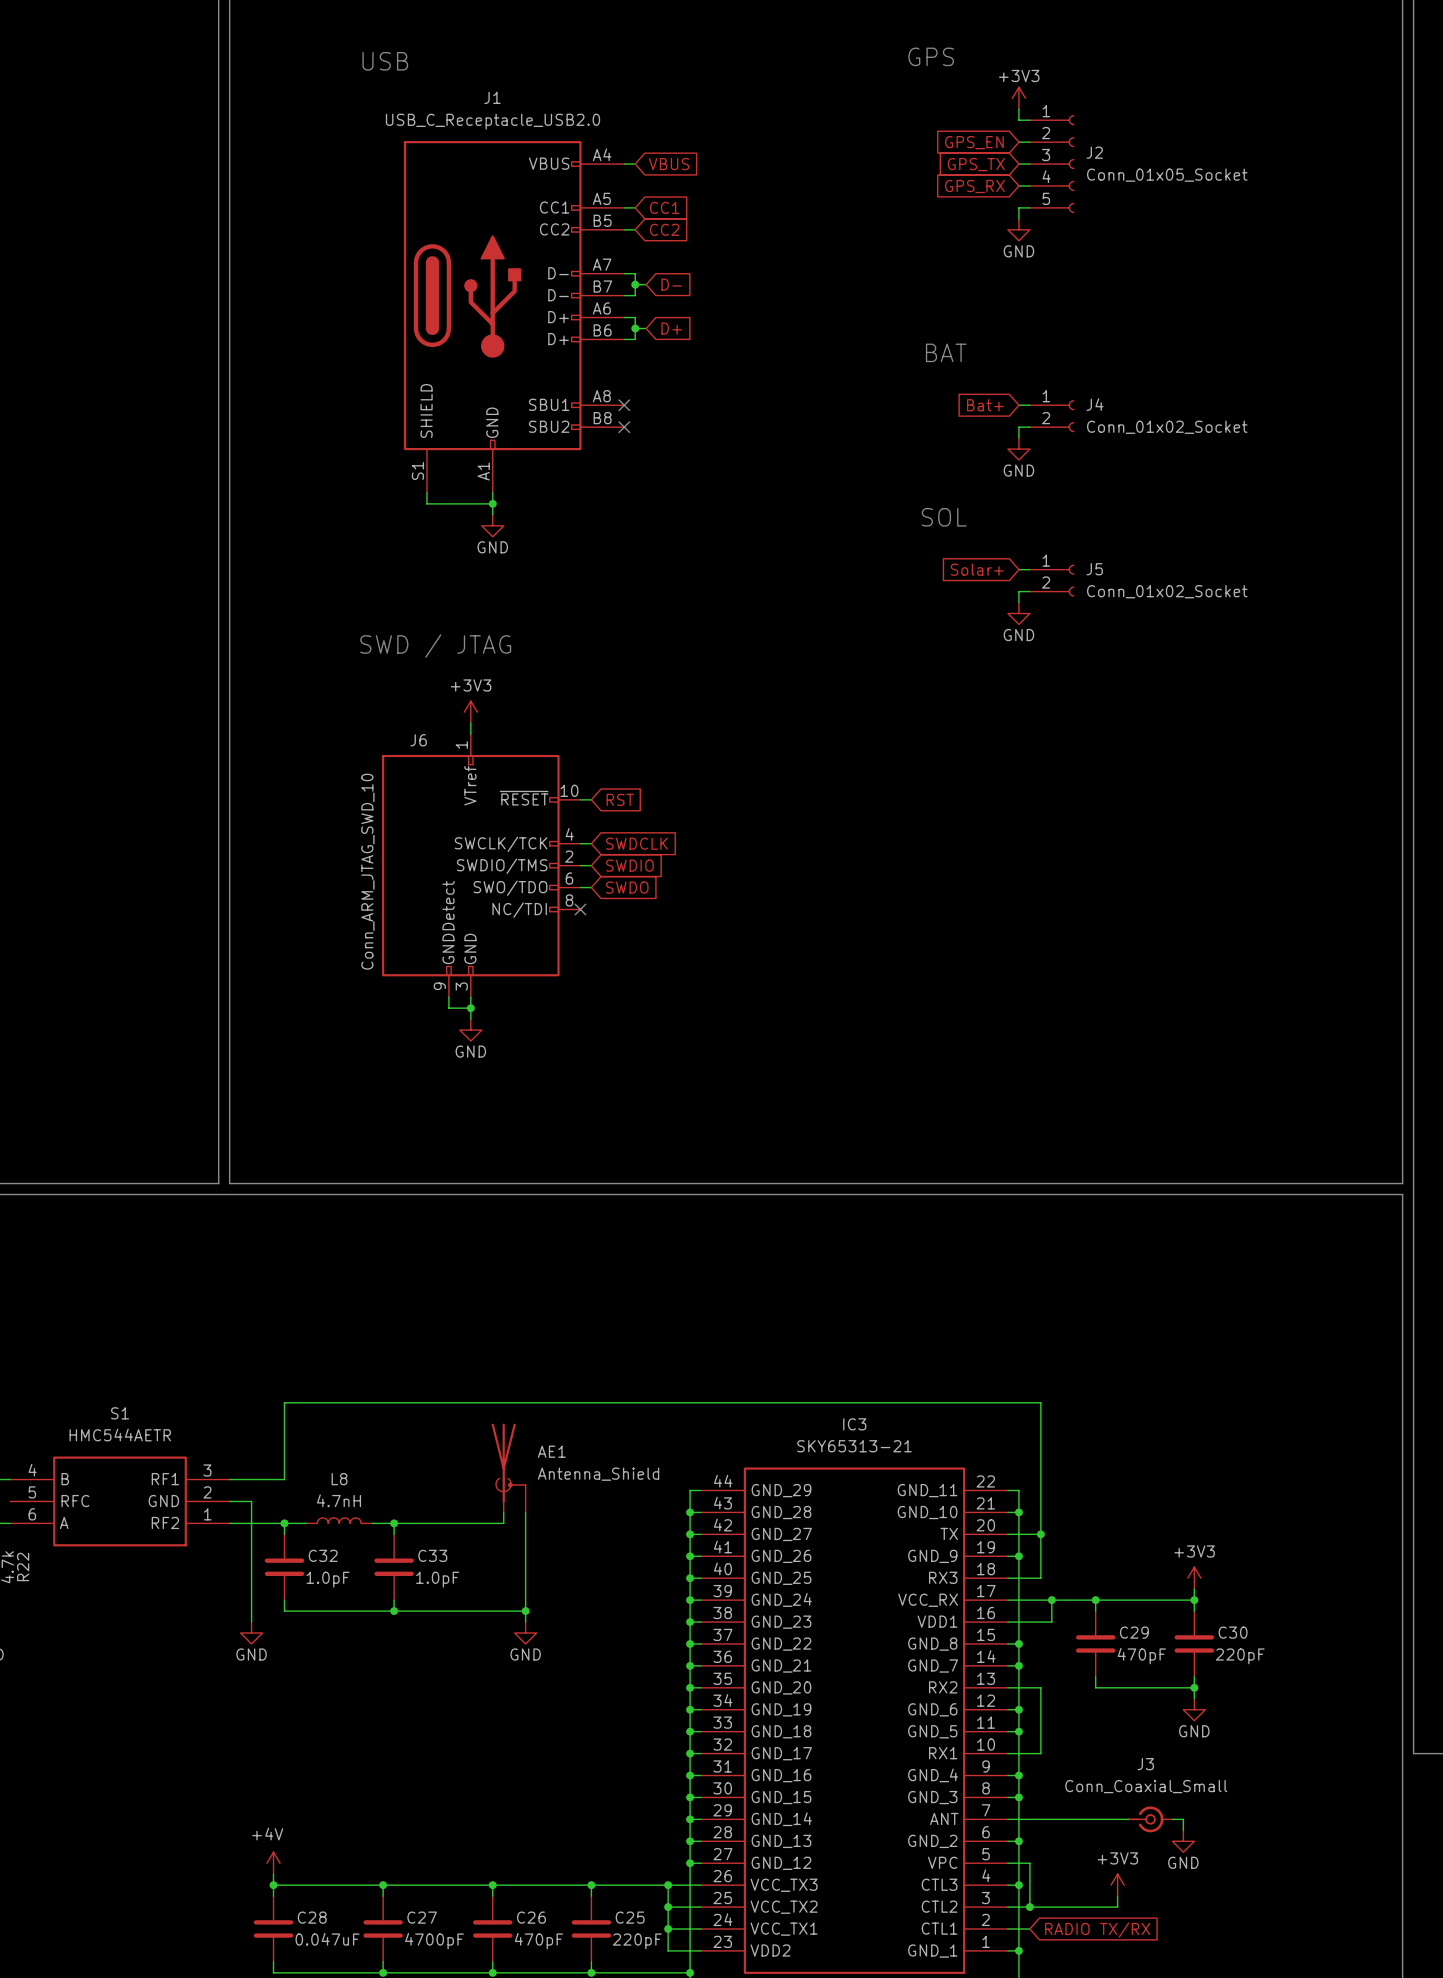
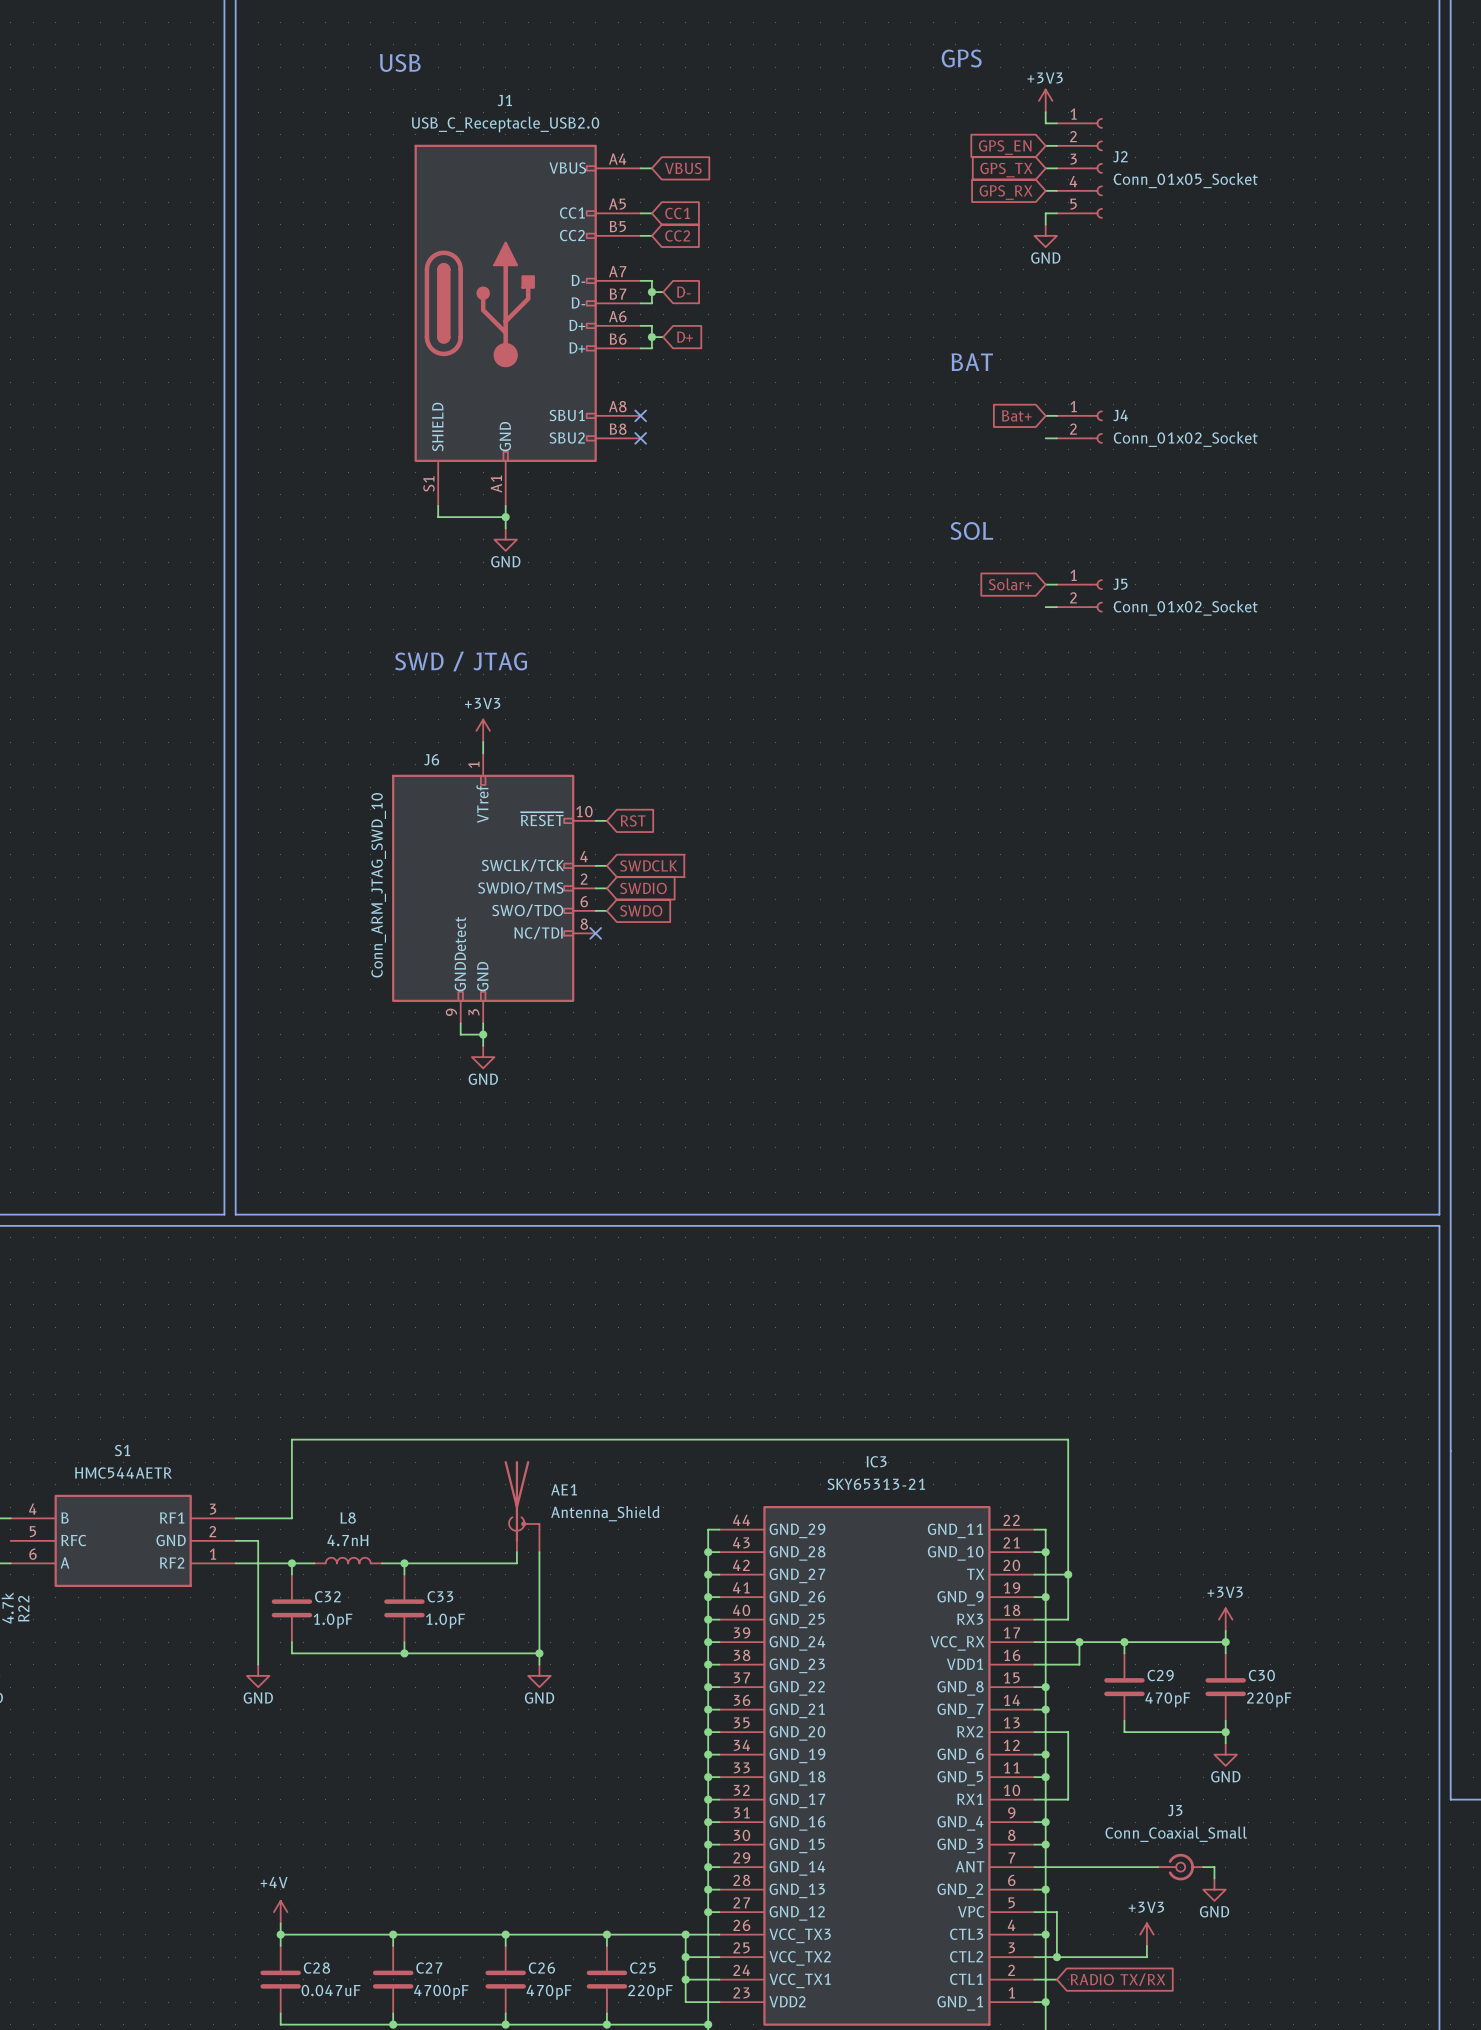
wire: (1018, 427) (1018, 438) -> none
power symbol: GND (1018, 449) -> none
wire: (1018, 591) (1018, 602) -> none
power symbol: GND (1018, 613) -> none

